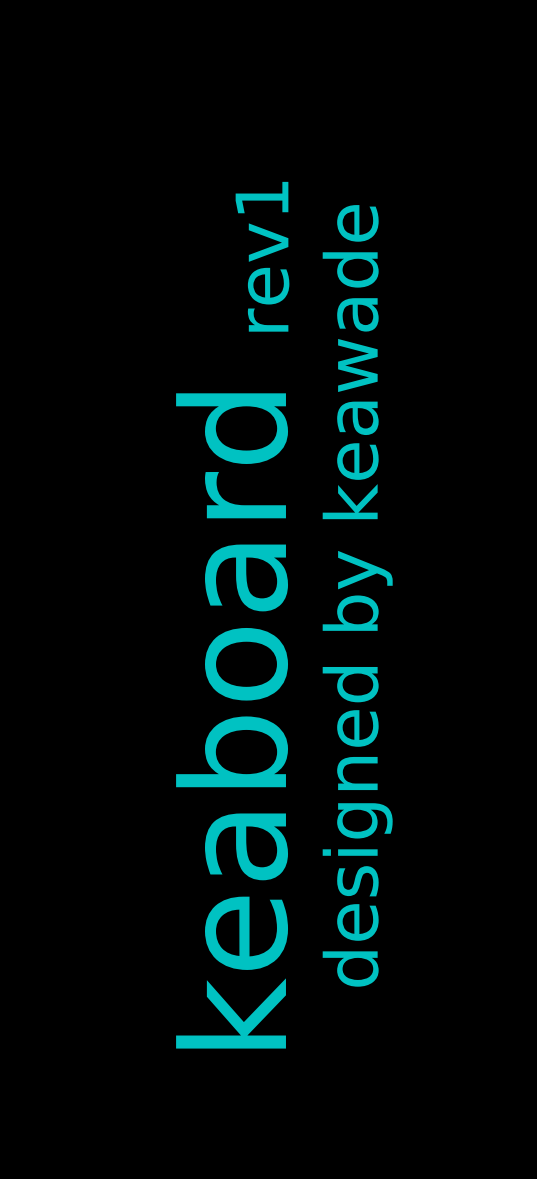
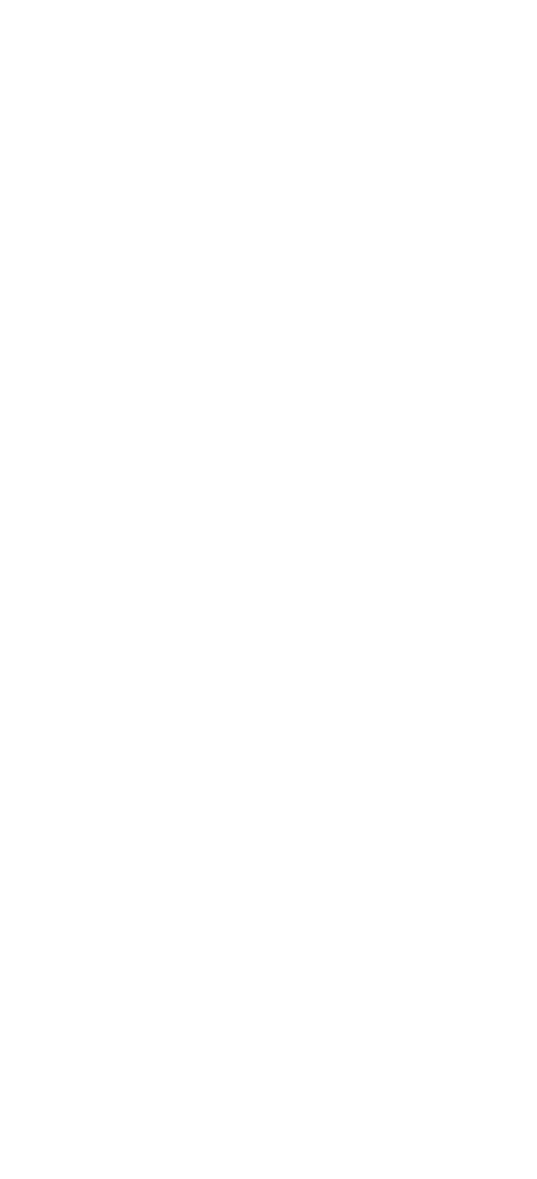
text: rev1 (262, 256) -> none
text: designed by keawade (357, 595) -> none
text: keaboard (232, 720) -> none

